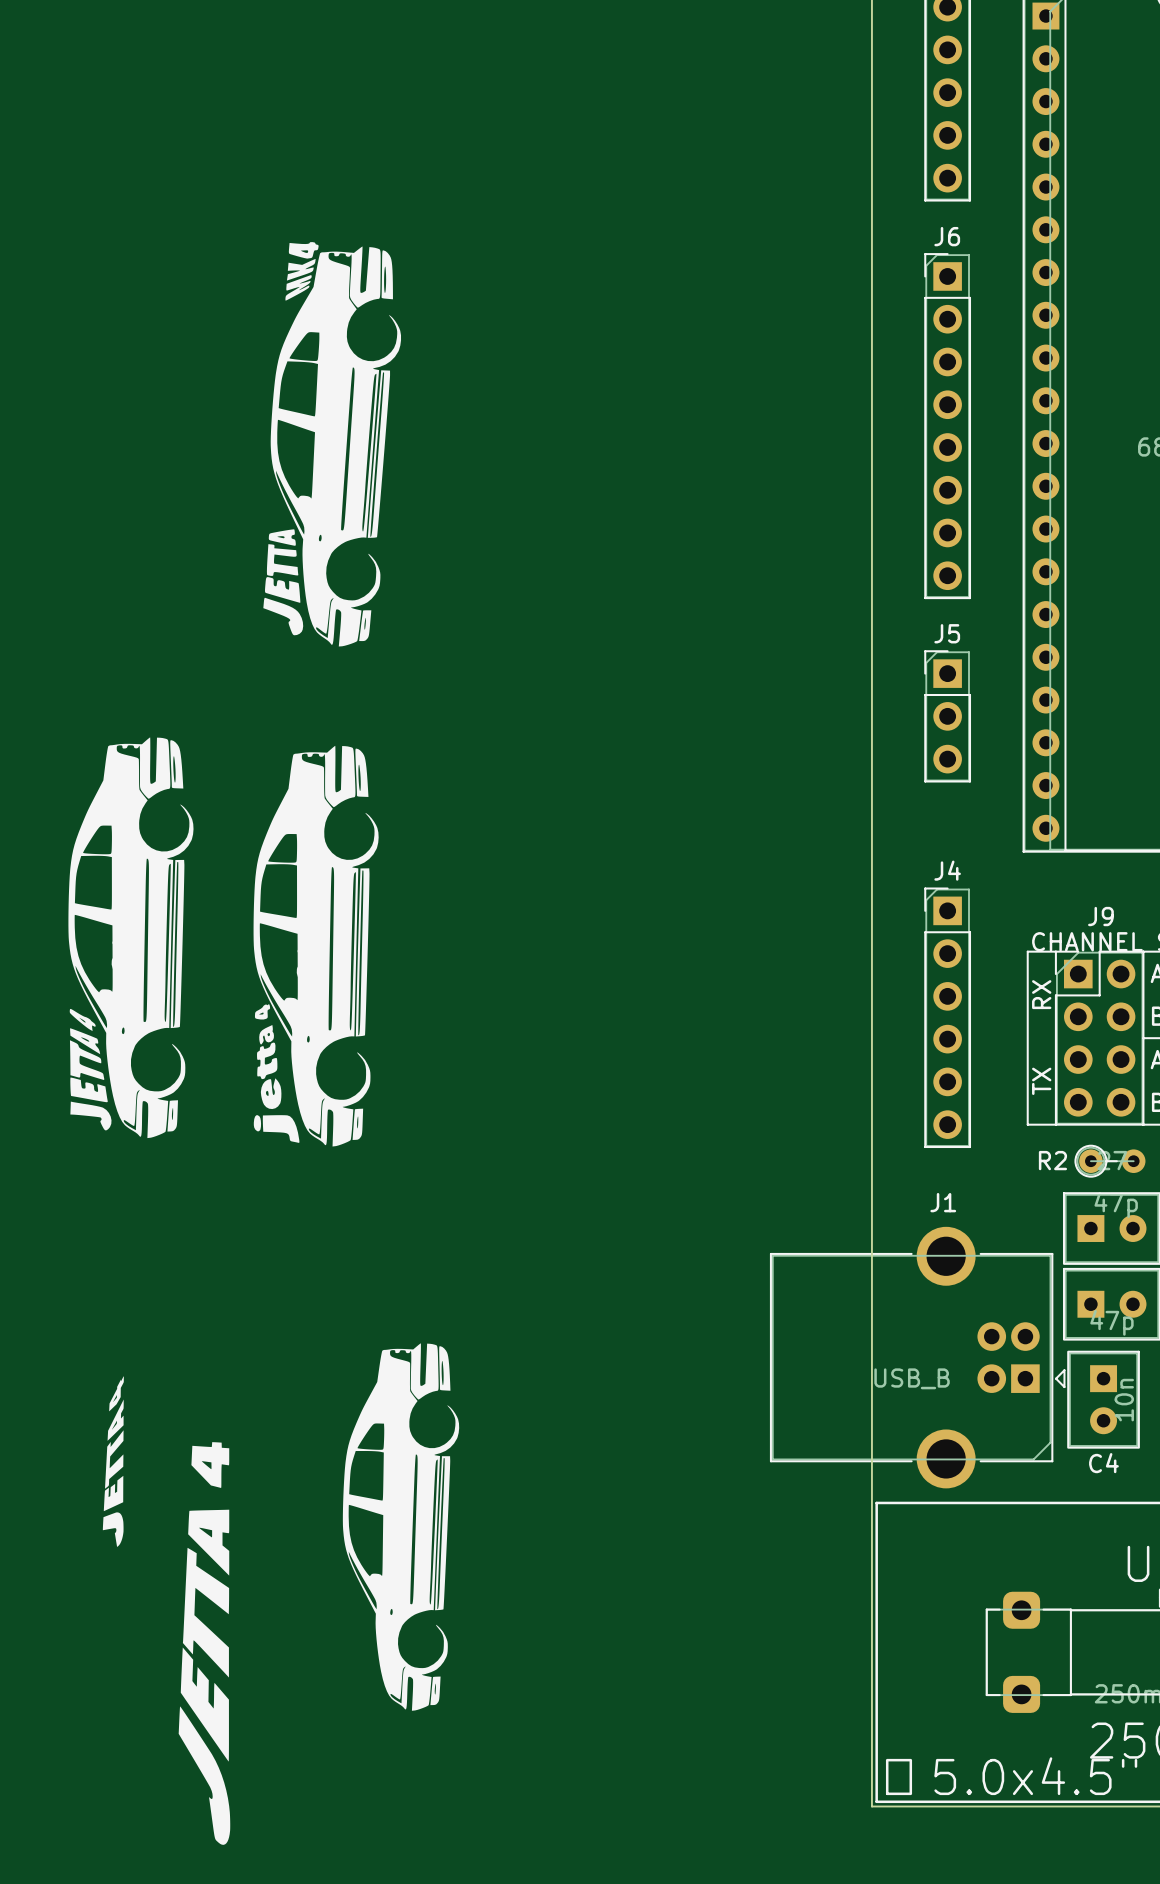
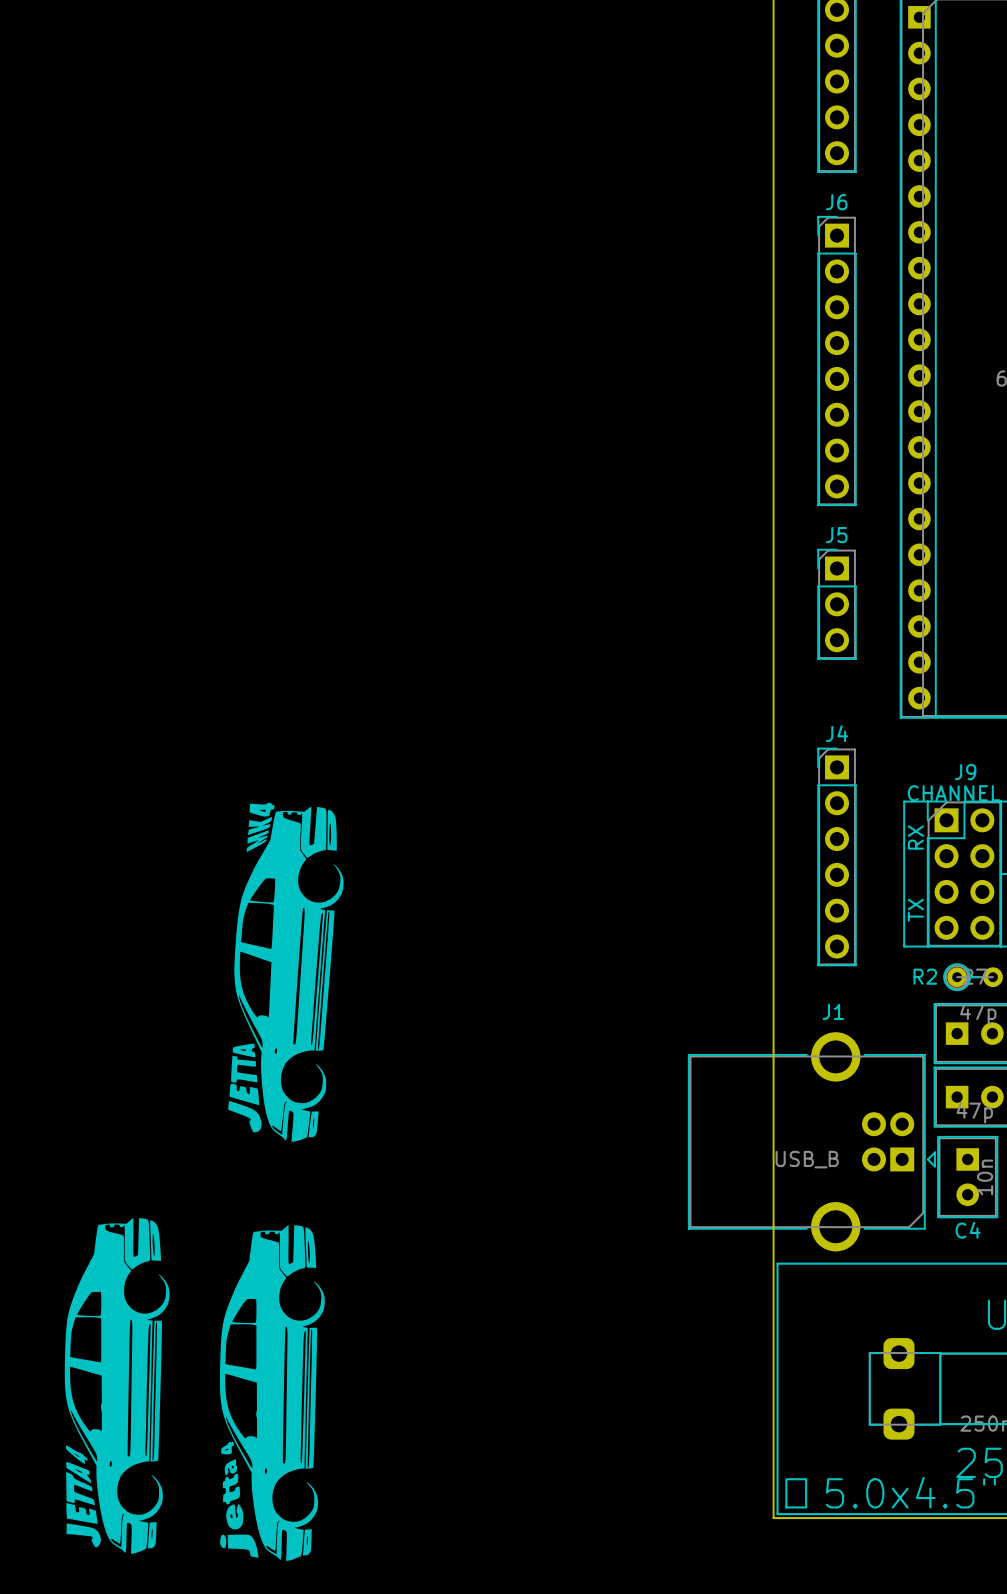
drawing: [263, 242, 402, 647] -> none
part: (130, 937) -> none
part: (316, 946) -> none
drawing: none -> [228, 802, 344, 1142]
drawing: [342, 1343, 460, 1711] -> none
drawing: [102, 1376, 124, 1547] -> none
drawing: [178, 1442, 231, 1845] -> none
part: none -> (117, 1385)
part: none -> (272, 1392)

